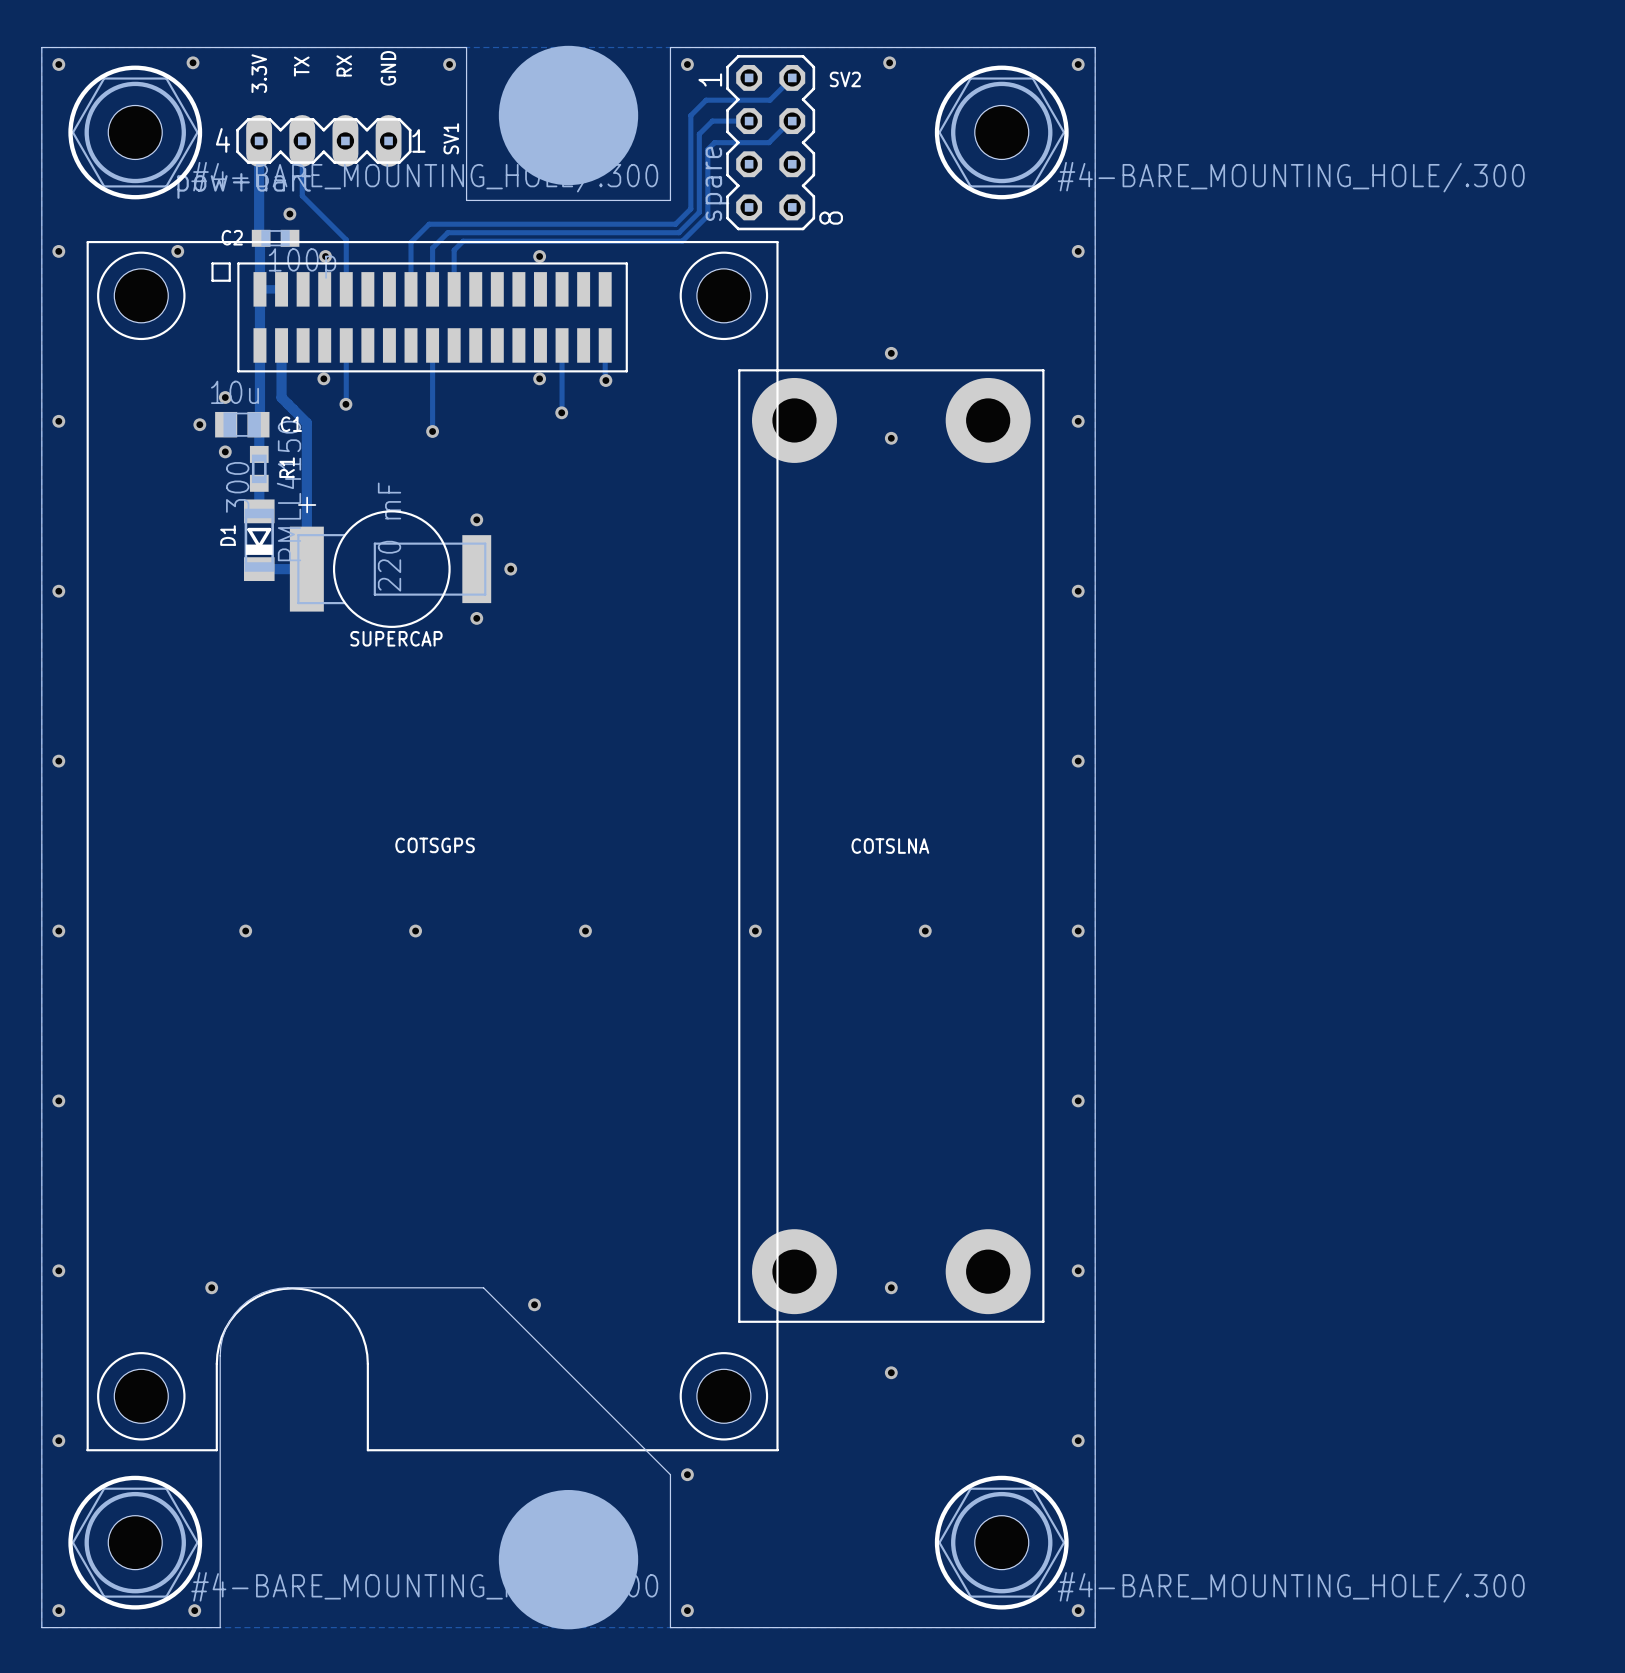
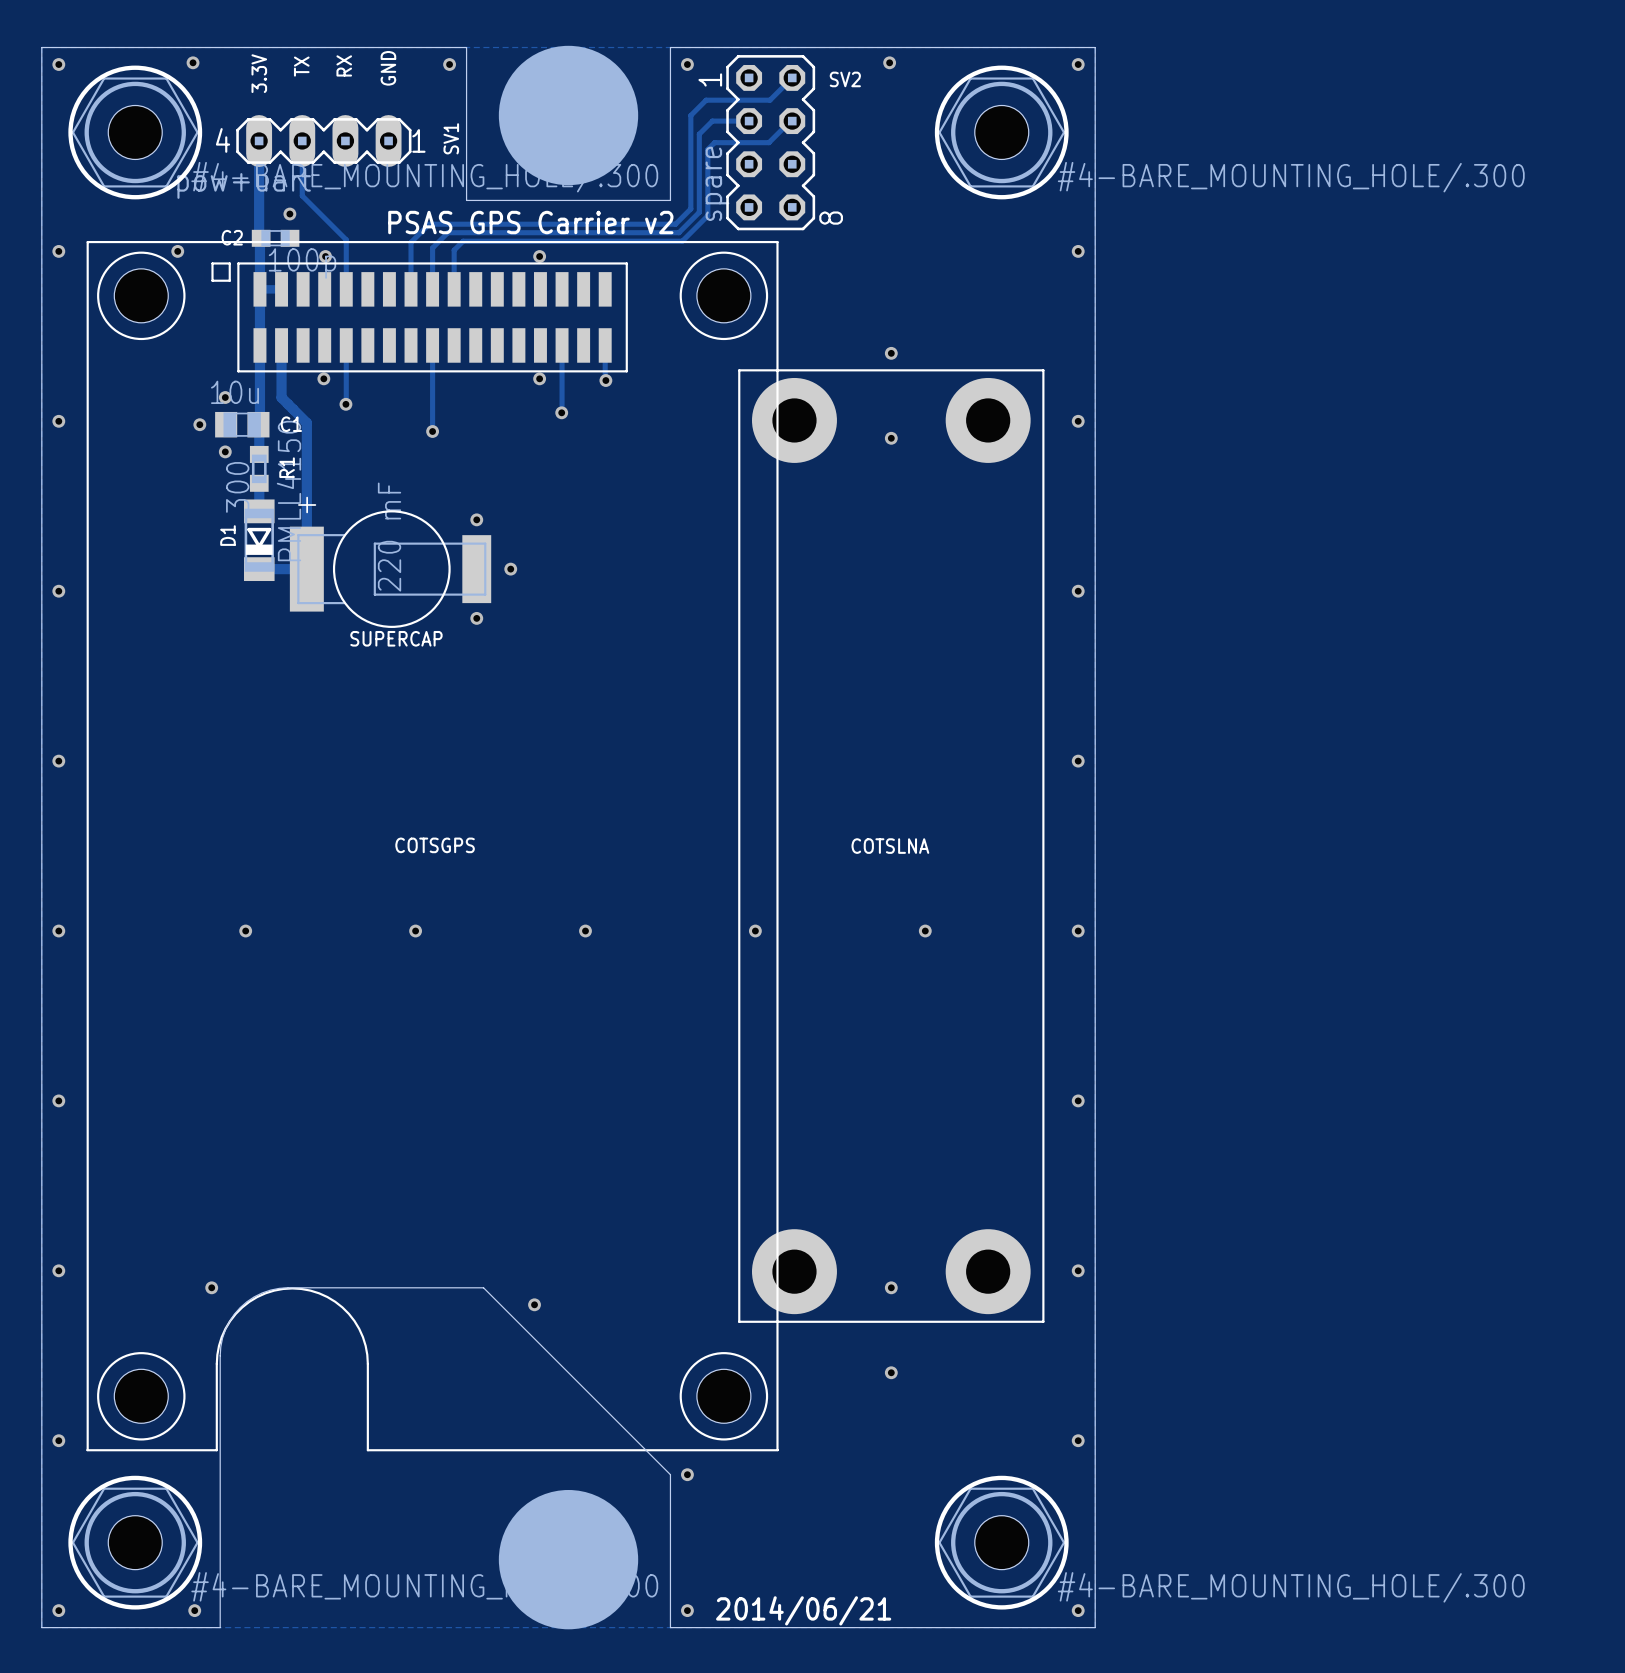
text: none -> PSAS GPS Carrier v2 (530, 222)
text: none -> 2014/06/21 (803, 1610)

